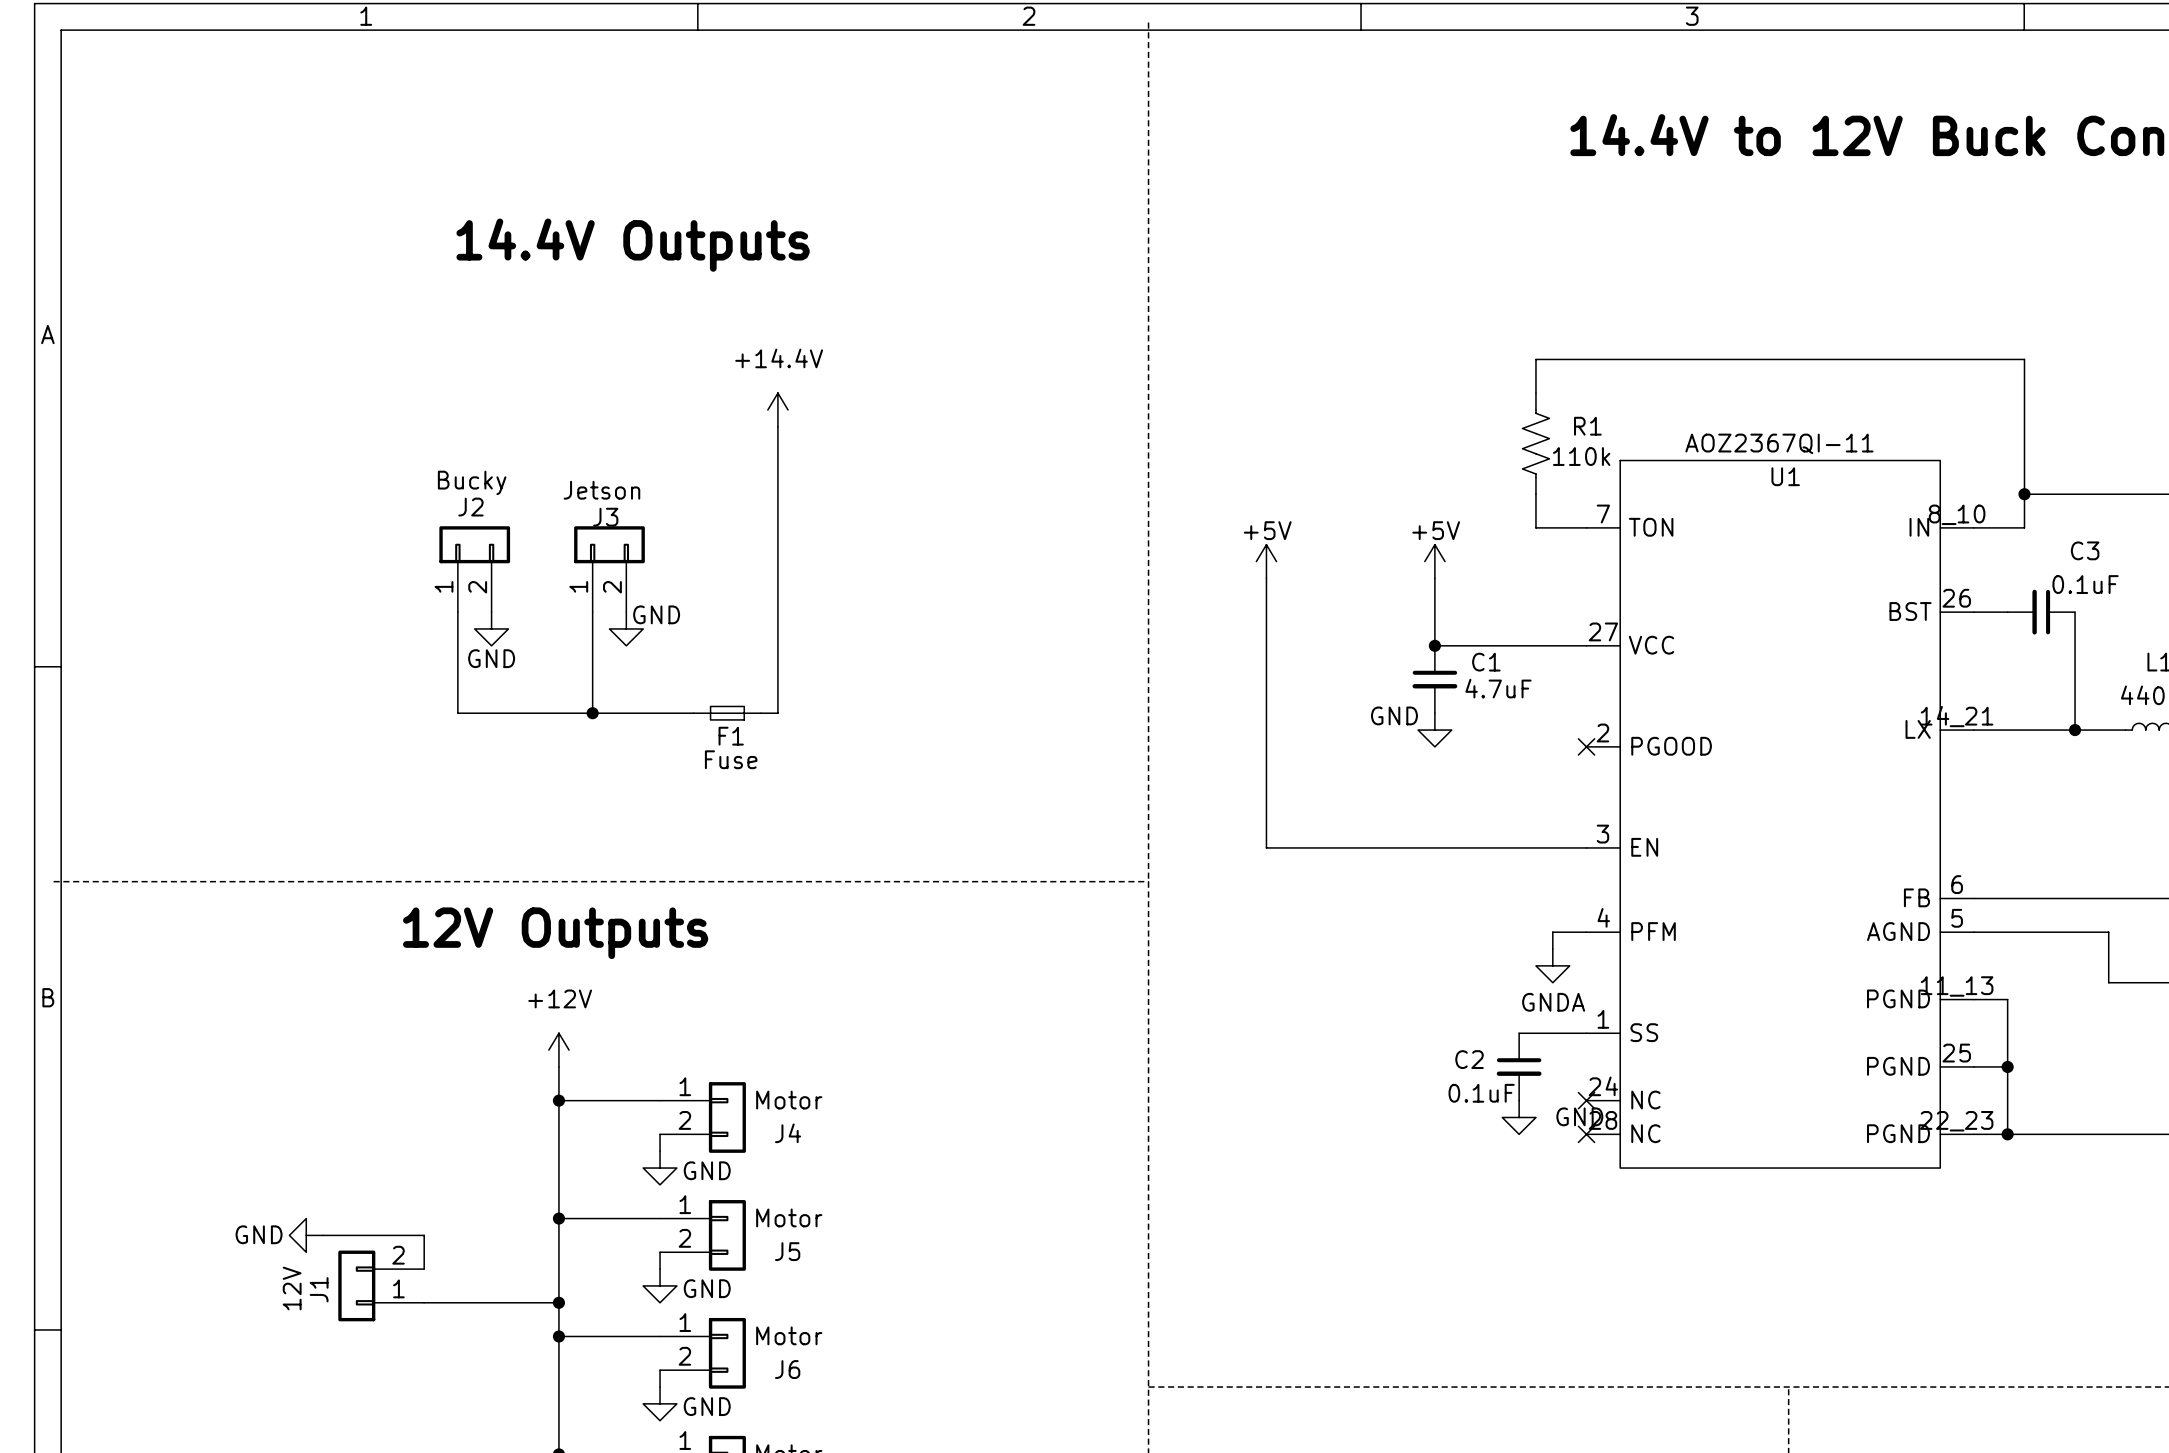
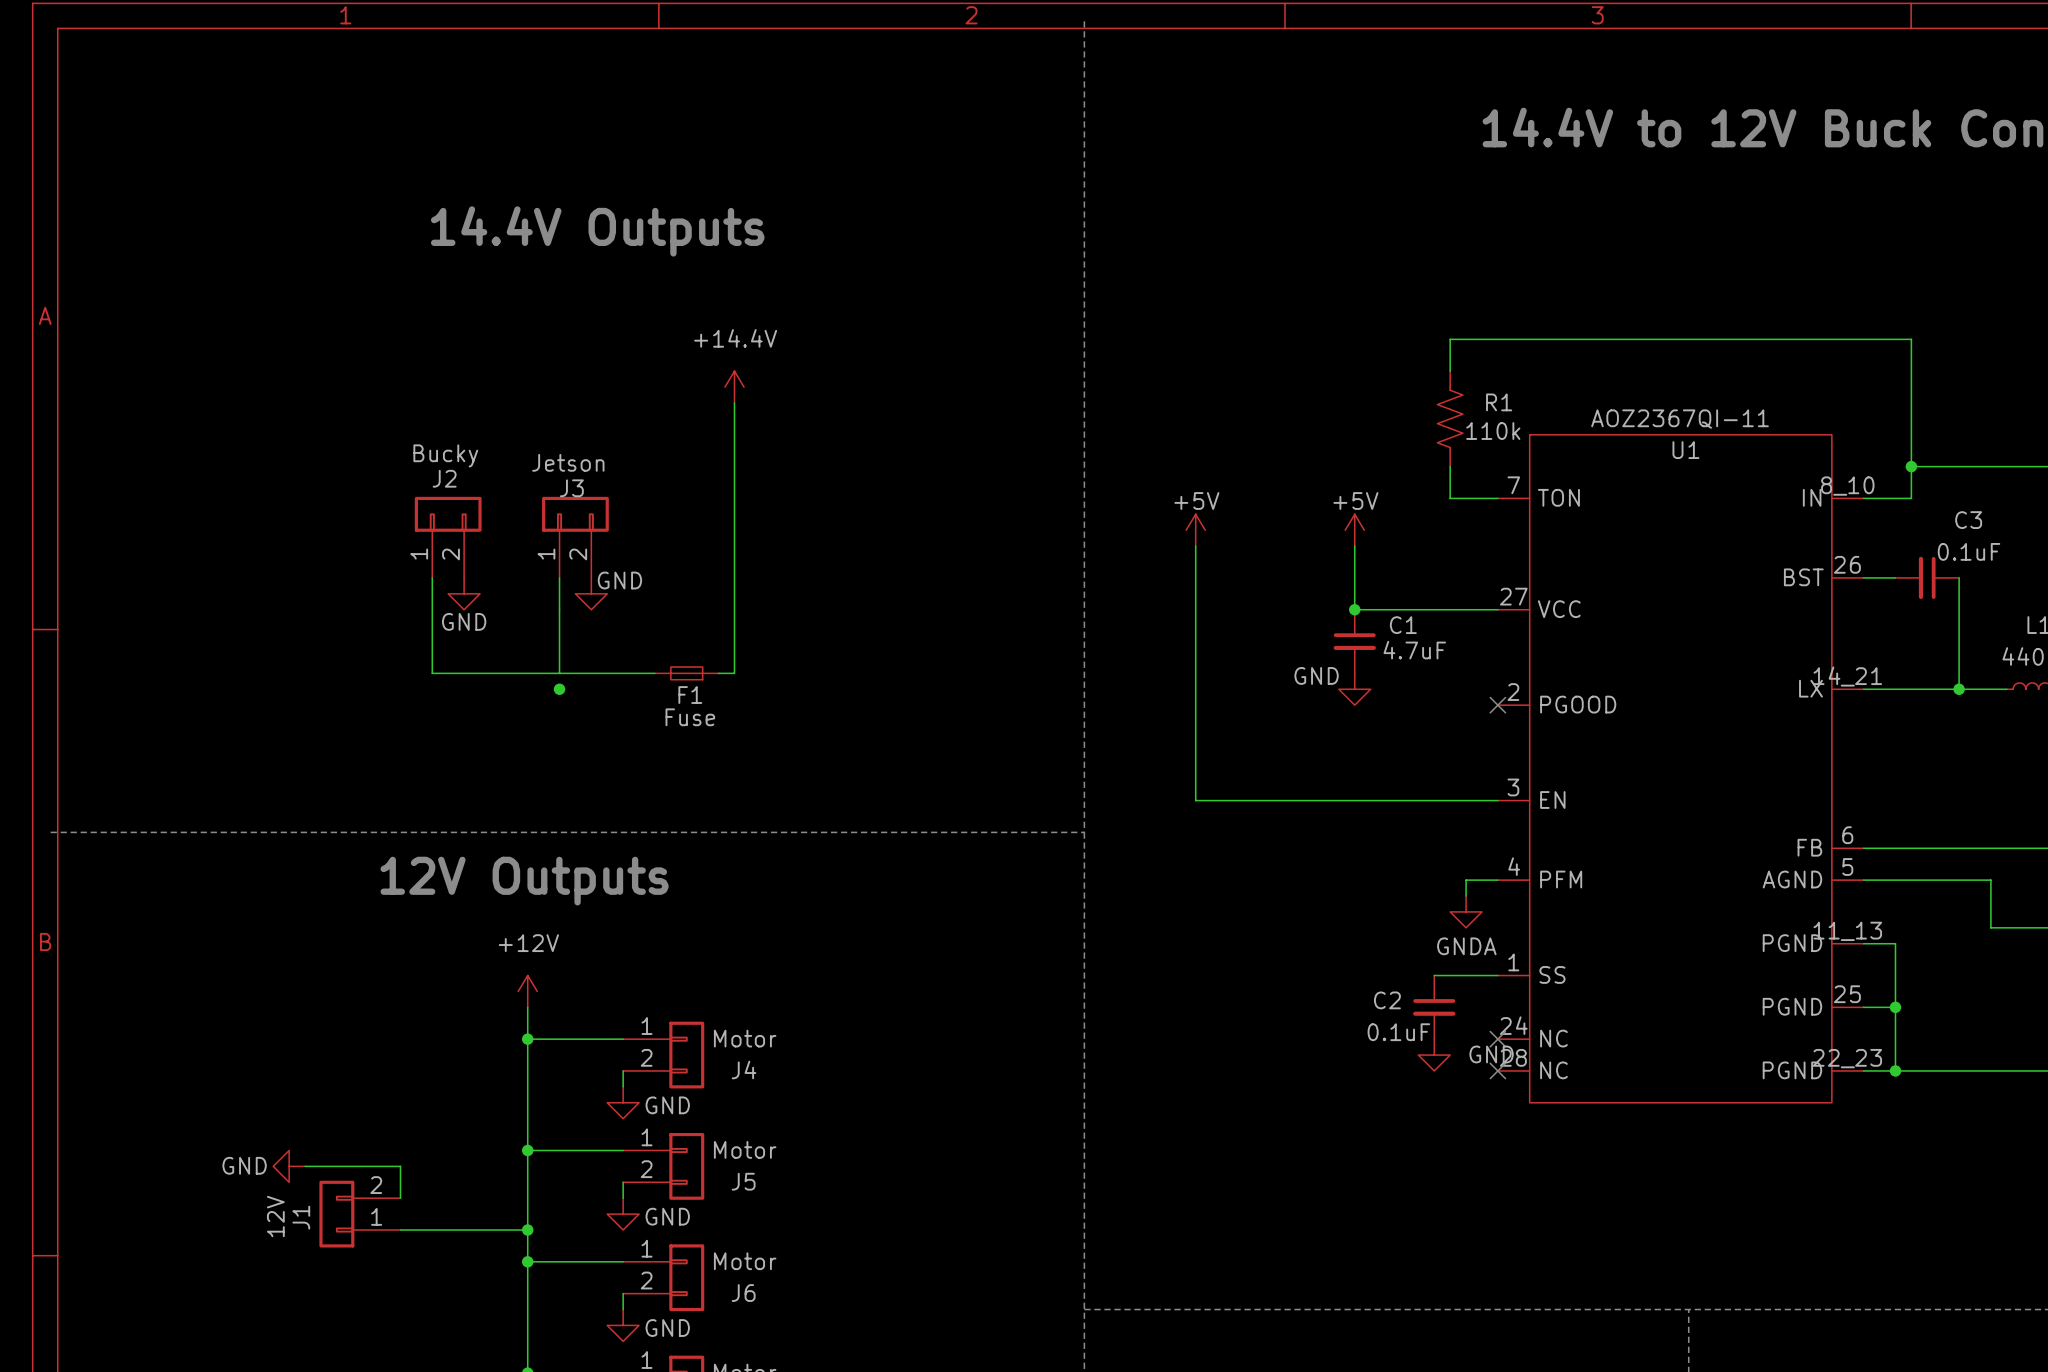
junction position: (592, 713) -> (559, 689)

